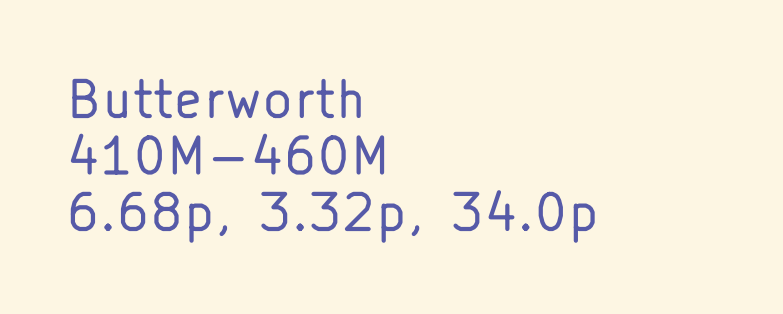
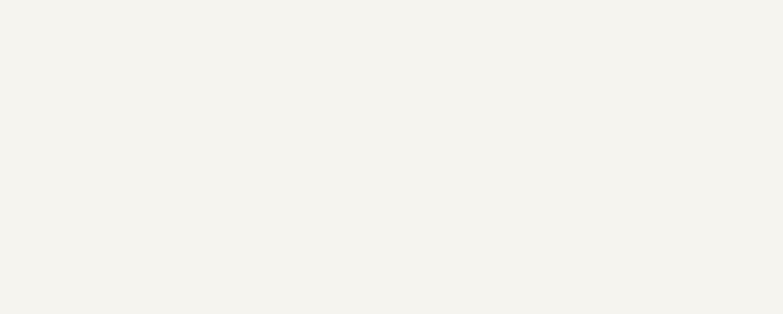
text: Butterworth (216, 98) -> none
text: 410M-460M (227, 154) -> none
text: 6.68p, 3.32p, 34.0p (332, 216) -> none

